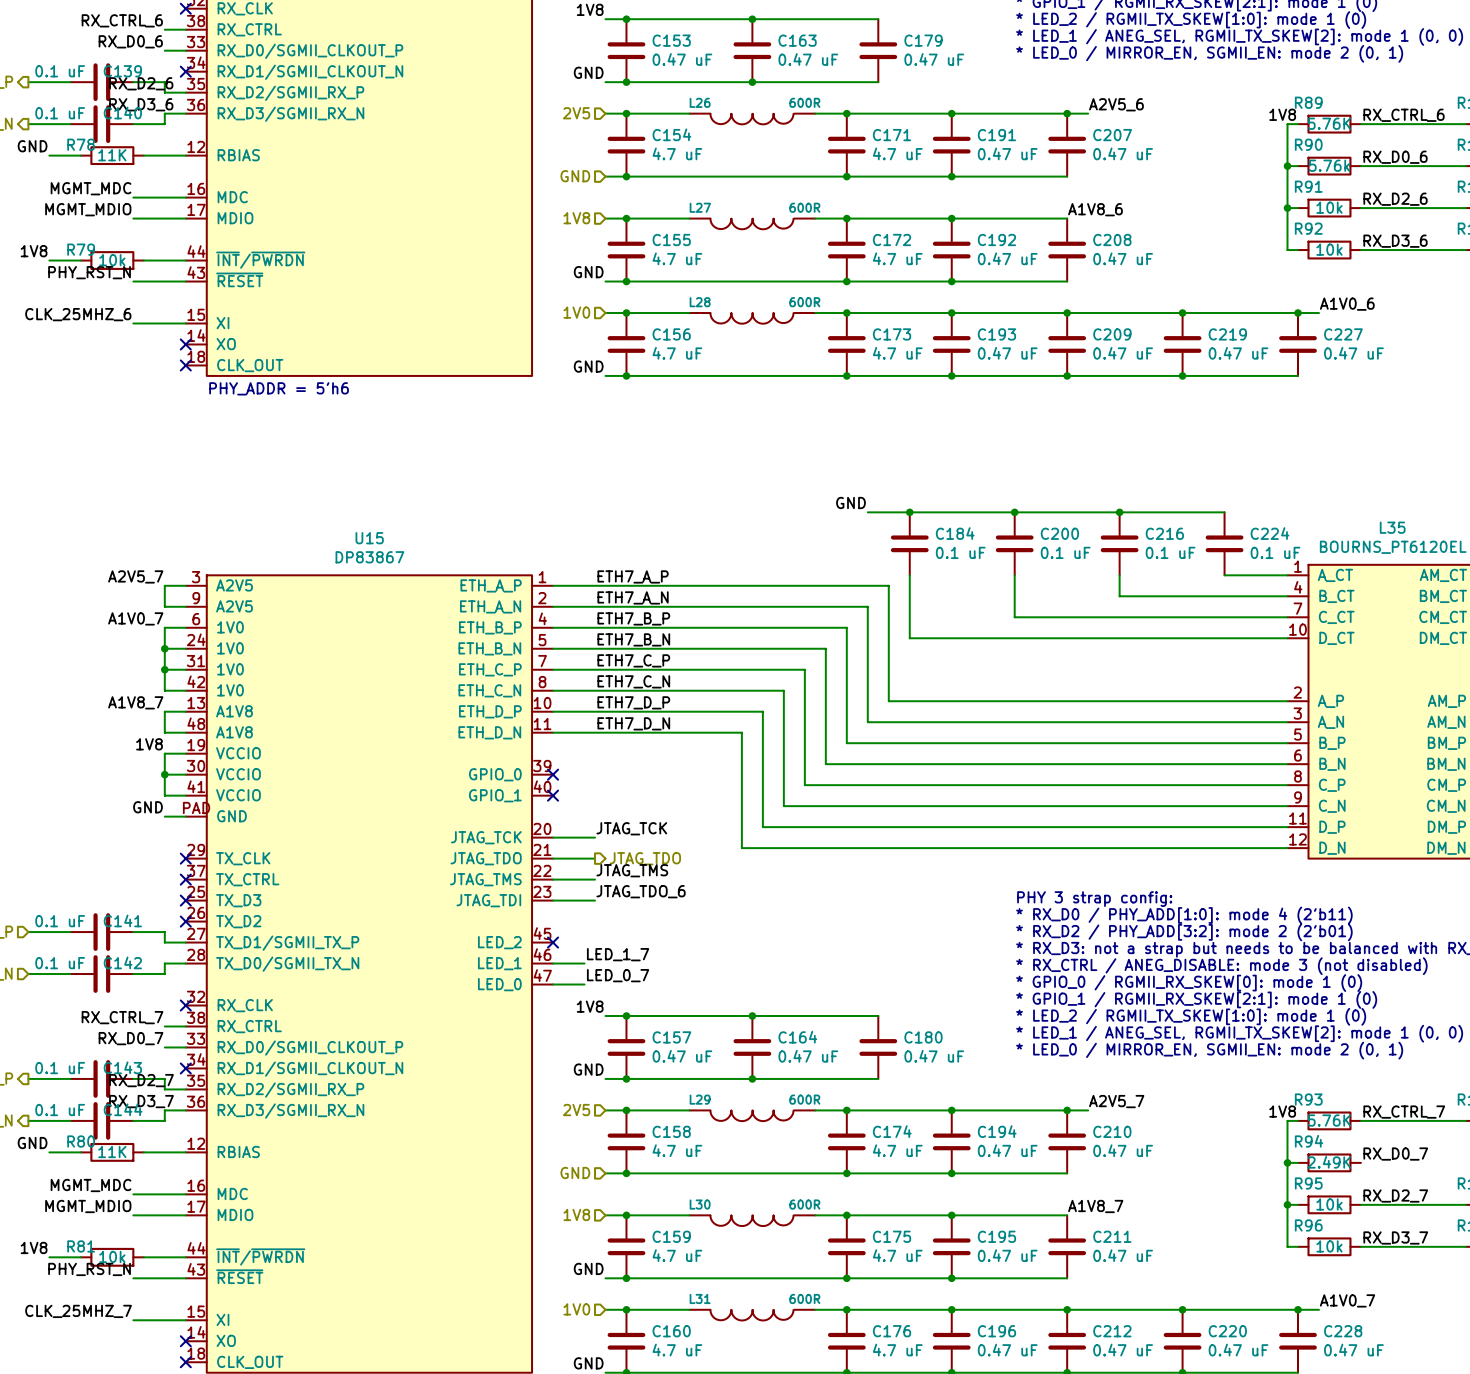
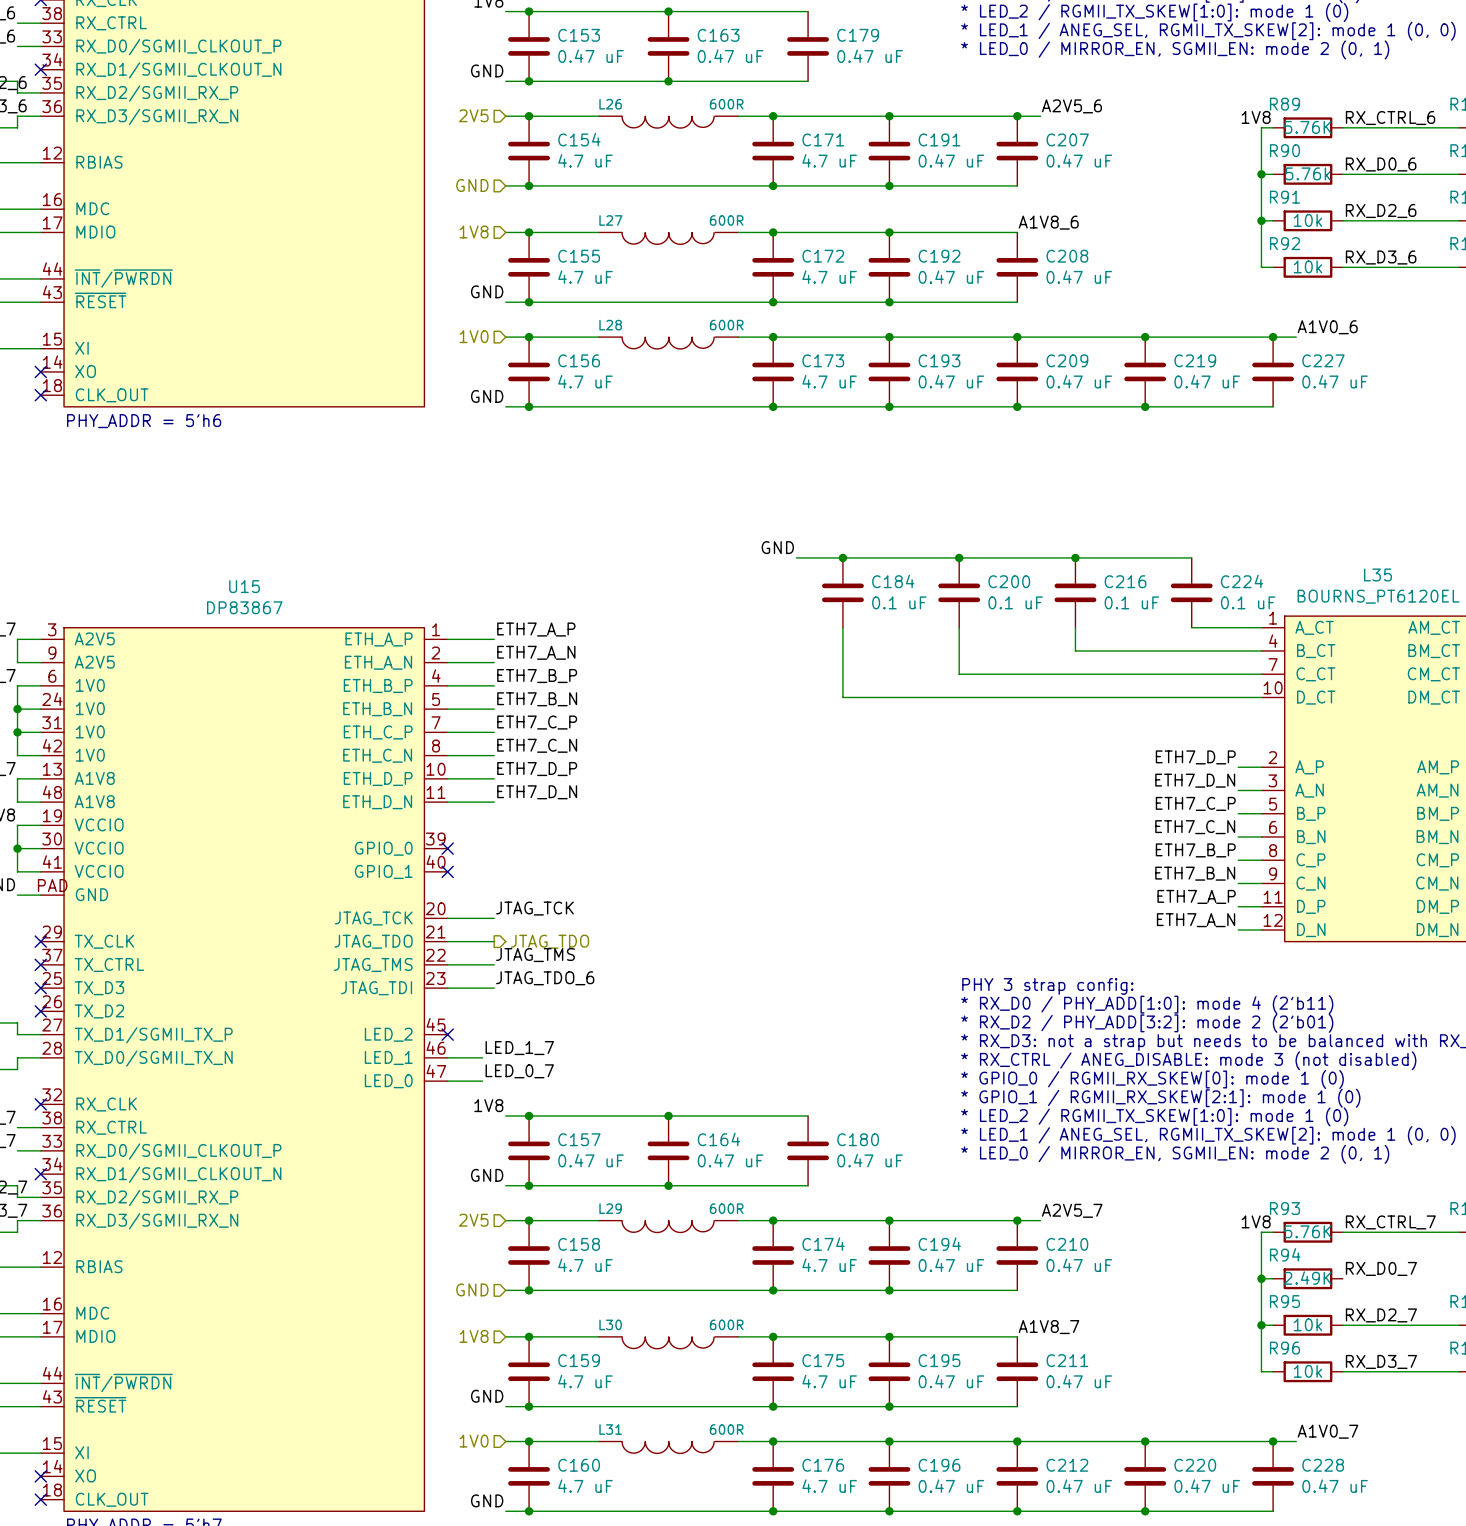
wire: (595, 585) (888, 585) (888, 701) (1266, 701) -> none
wire: (595, 606) (867, 606) (867, 722) (1266, 722) -> none
wire: (595, 627) (846, 627) (846, 743) (1266, 743) -> none
wire: (595, 648) (825, 648) (825, 764) (1266, 764) -> none
wire: (595, 669) (804, 669) (804, 785) (1266, 785) -> none
wire: (595, 690) (783, 690) (783, 806) (1266, 806) -> none
label: none -> ETH7_D_P (1195, 757)
wire: (595, 711) (762, 711) (762, 827) (1266, 827) -> none
label: none -> ETH7_D_N (1195, 780)
wire: (595, 732) (741, 732) (741, 848) (1266, 848) -> none
label: none -> ETH7_C_P (1195, 803)
label: none -> ETH7_C_N (1195, 827)
label: none -> ETH7_B_P (1195, 850)
label: none -> ETH7_B_N (1195, 873)
label: none -> ETH7_A_P (1196, 896)
label: none -> ETH7_A_N (1196, 920)

